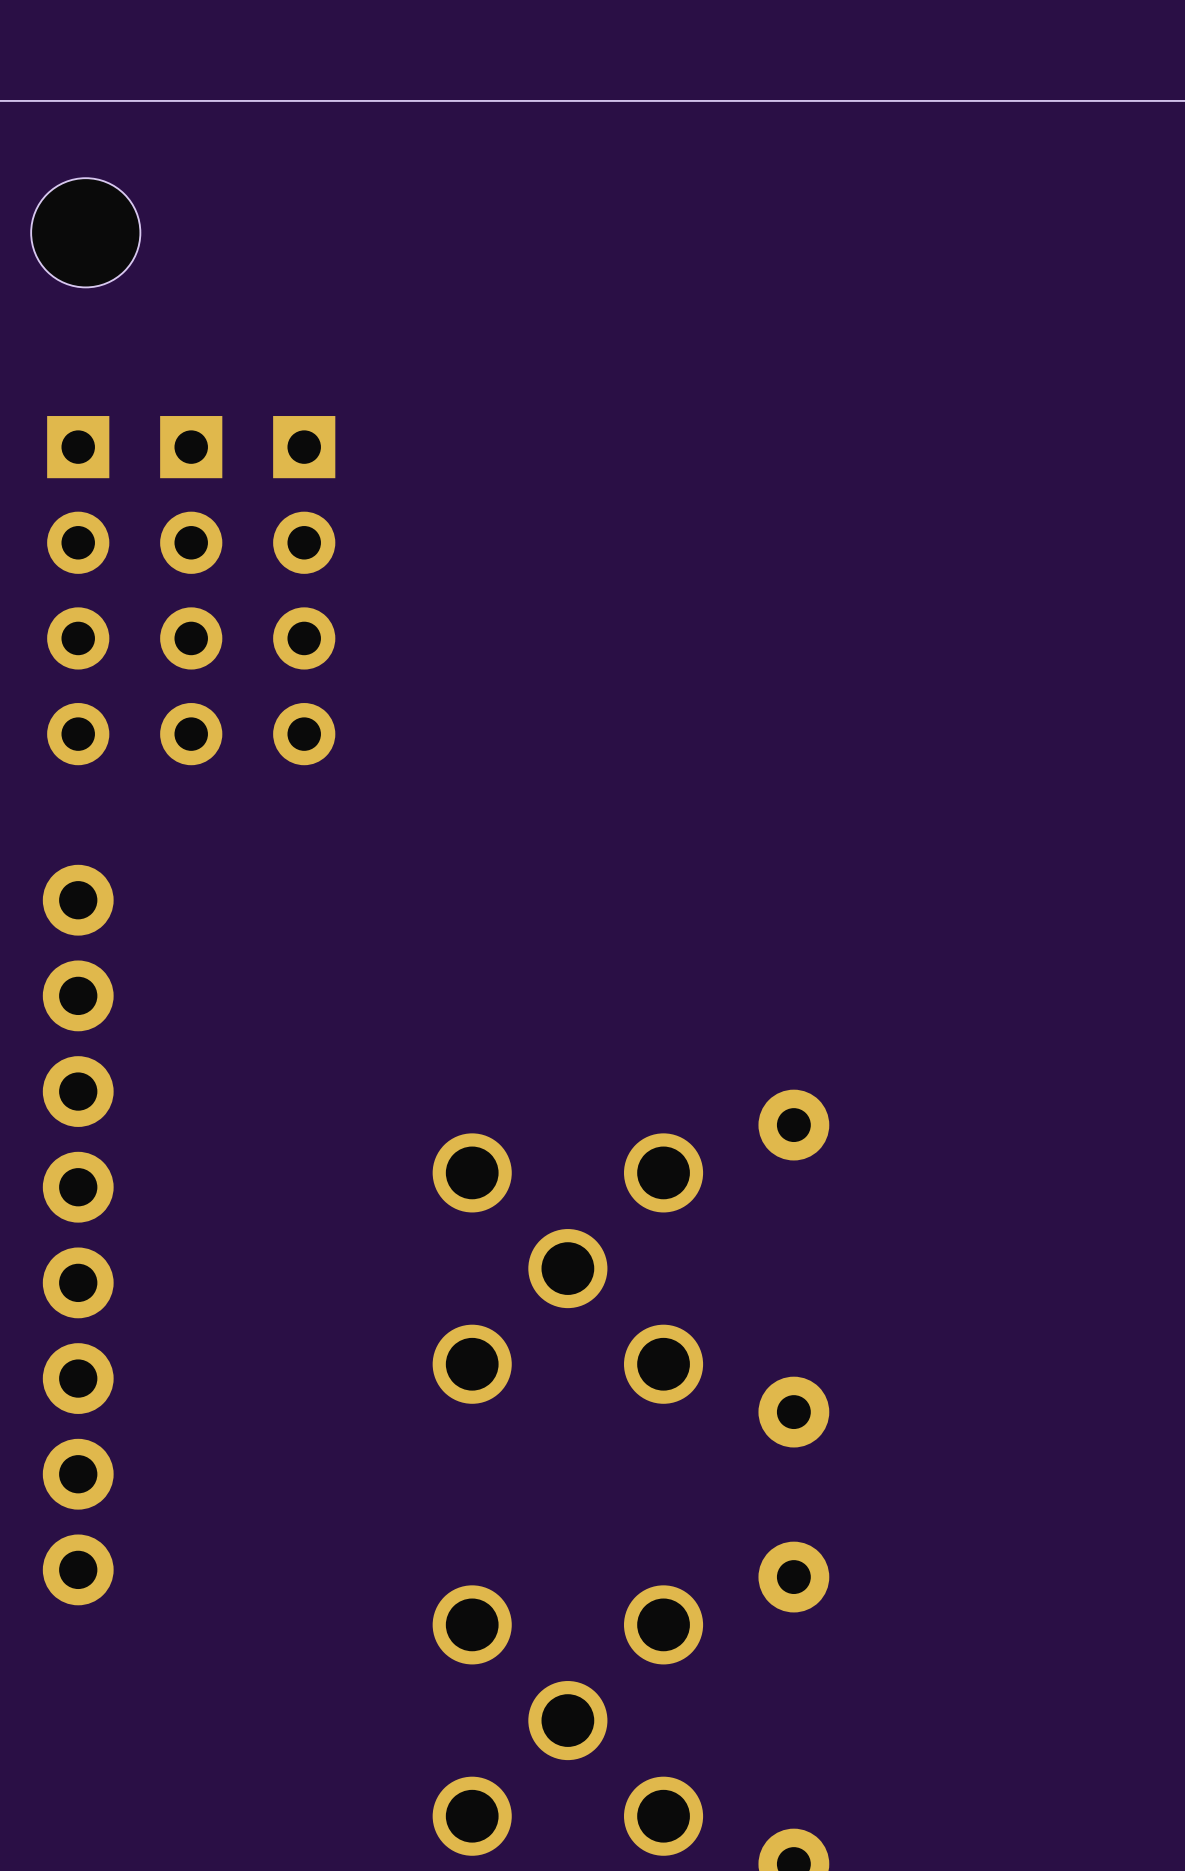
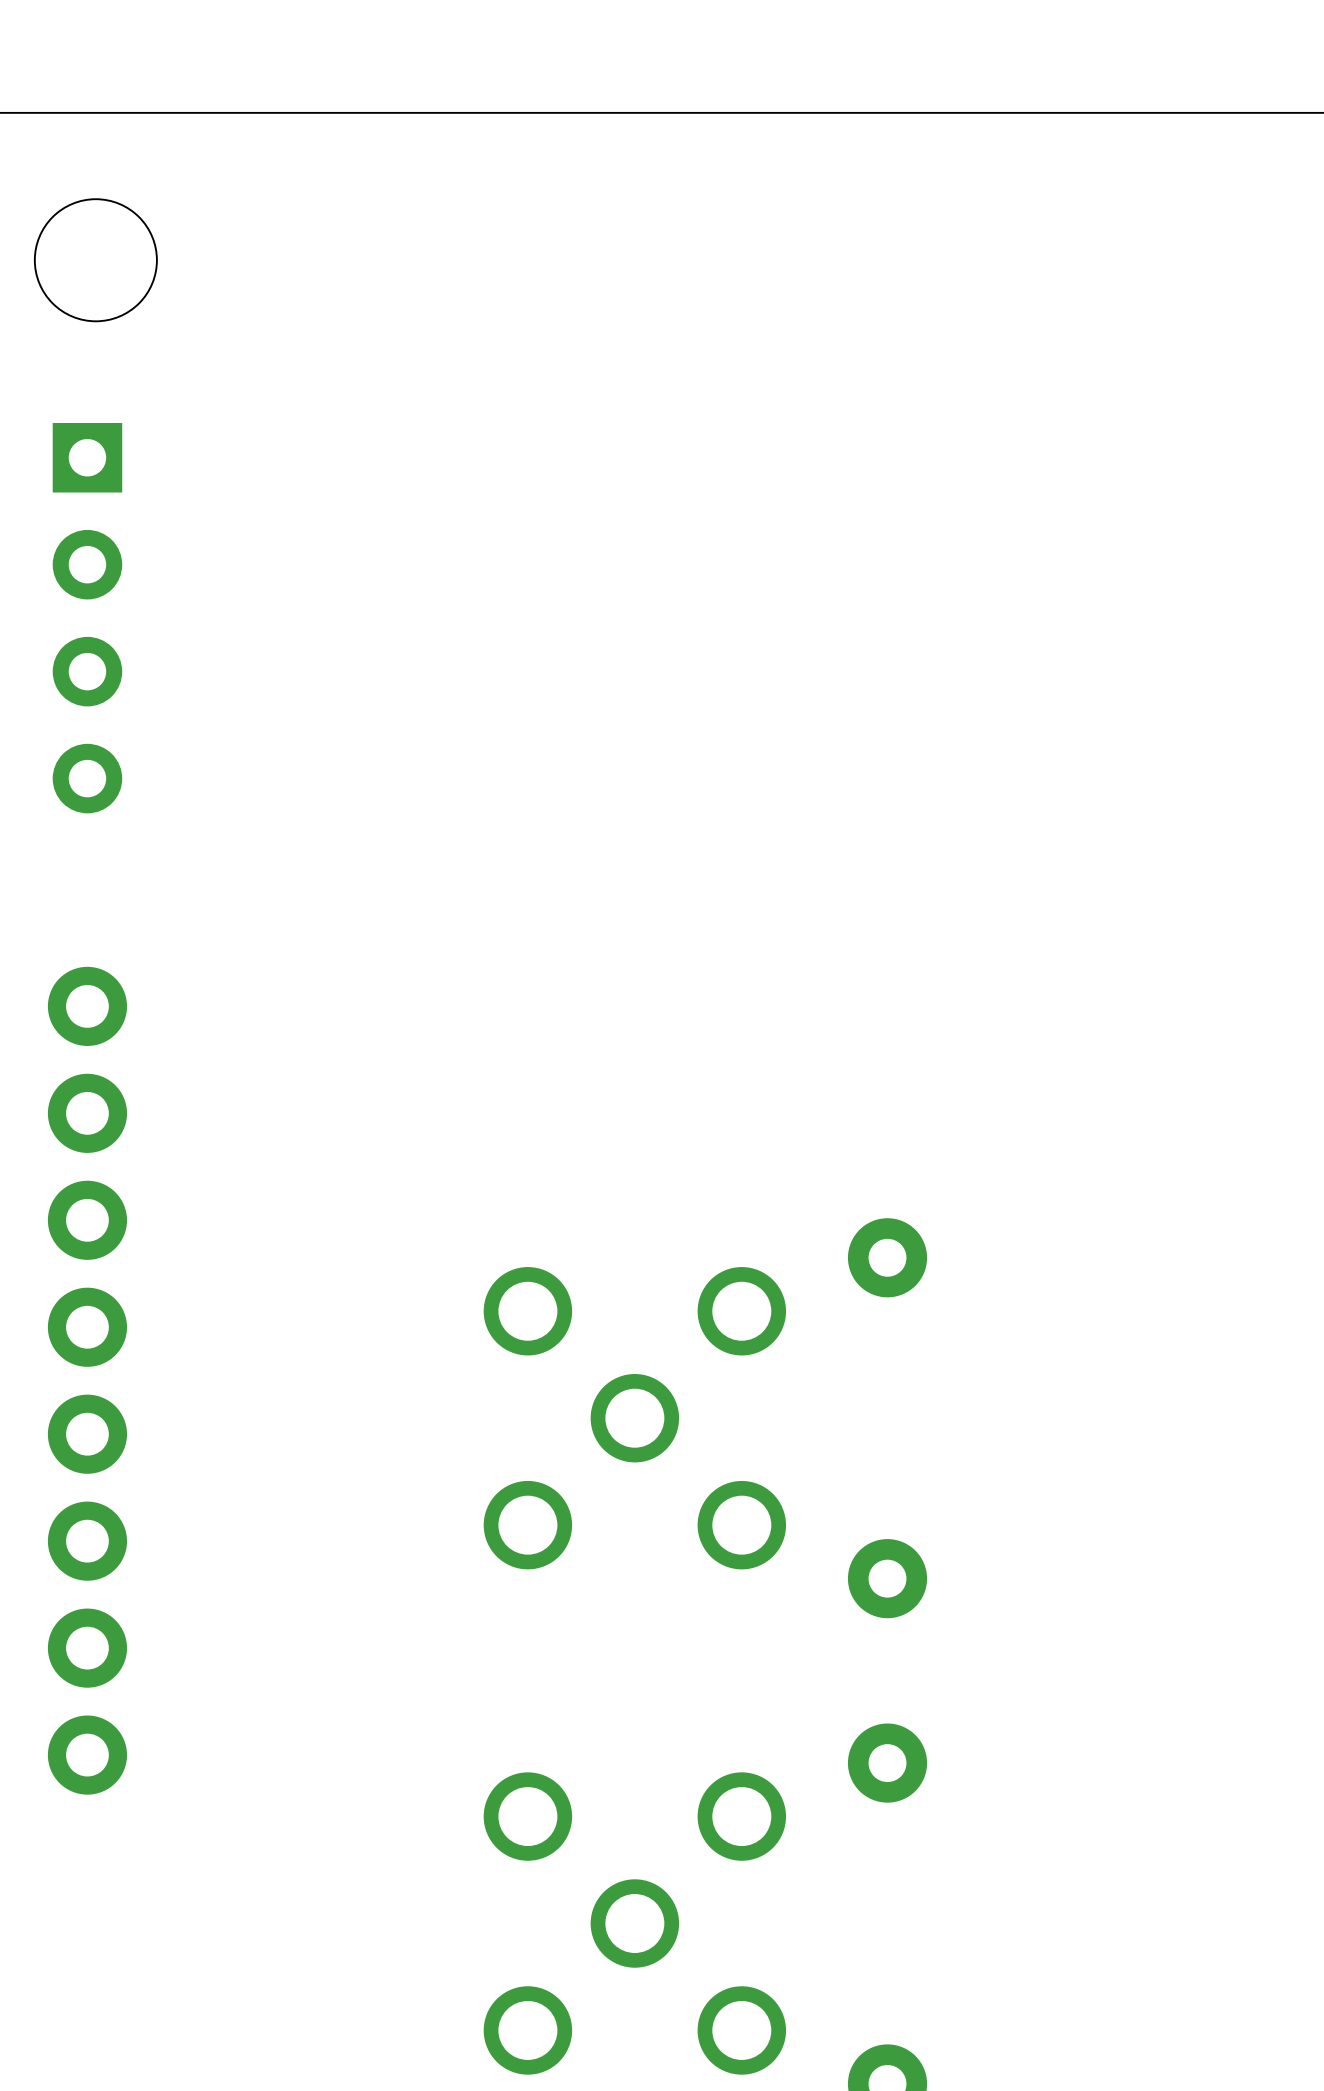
part position: (78, 590) -> (87, 618)
part: (191, 590) -> none
part: (304, 590) -> none

